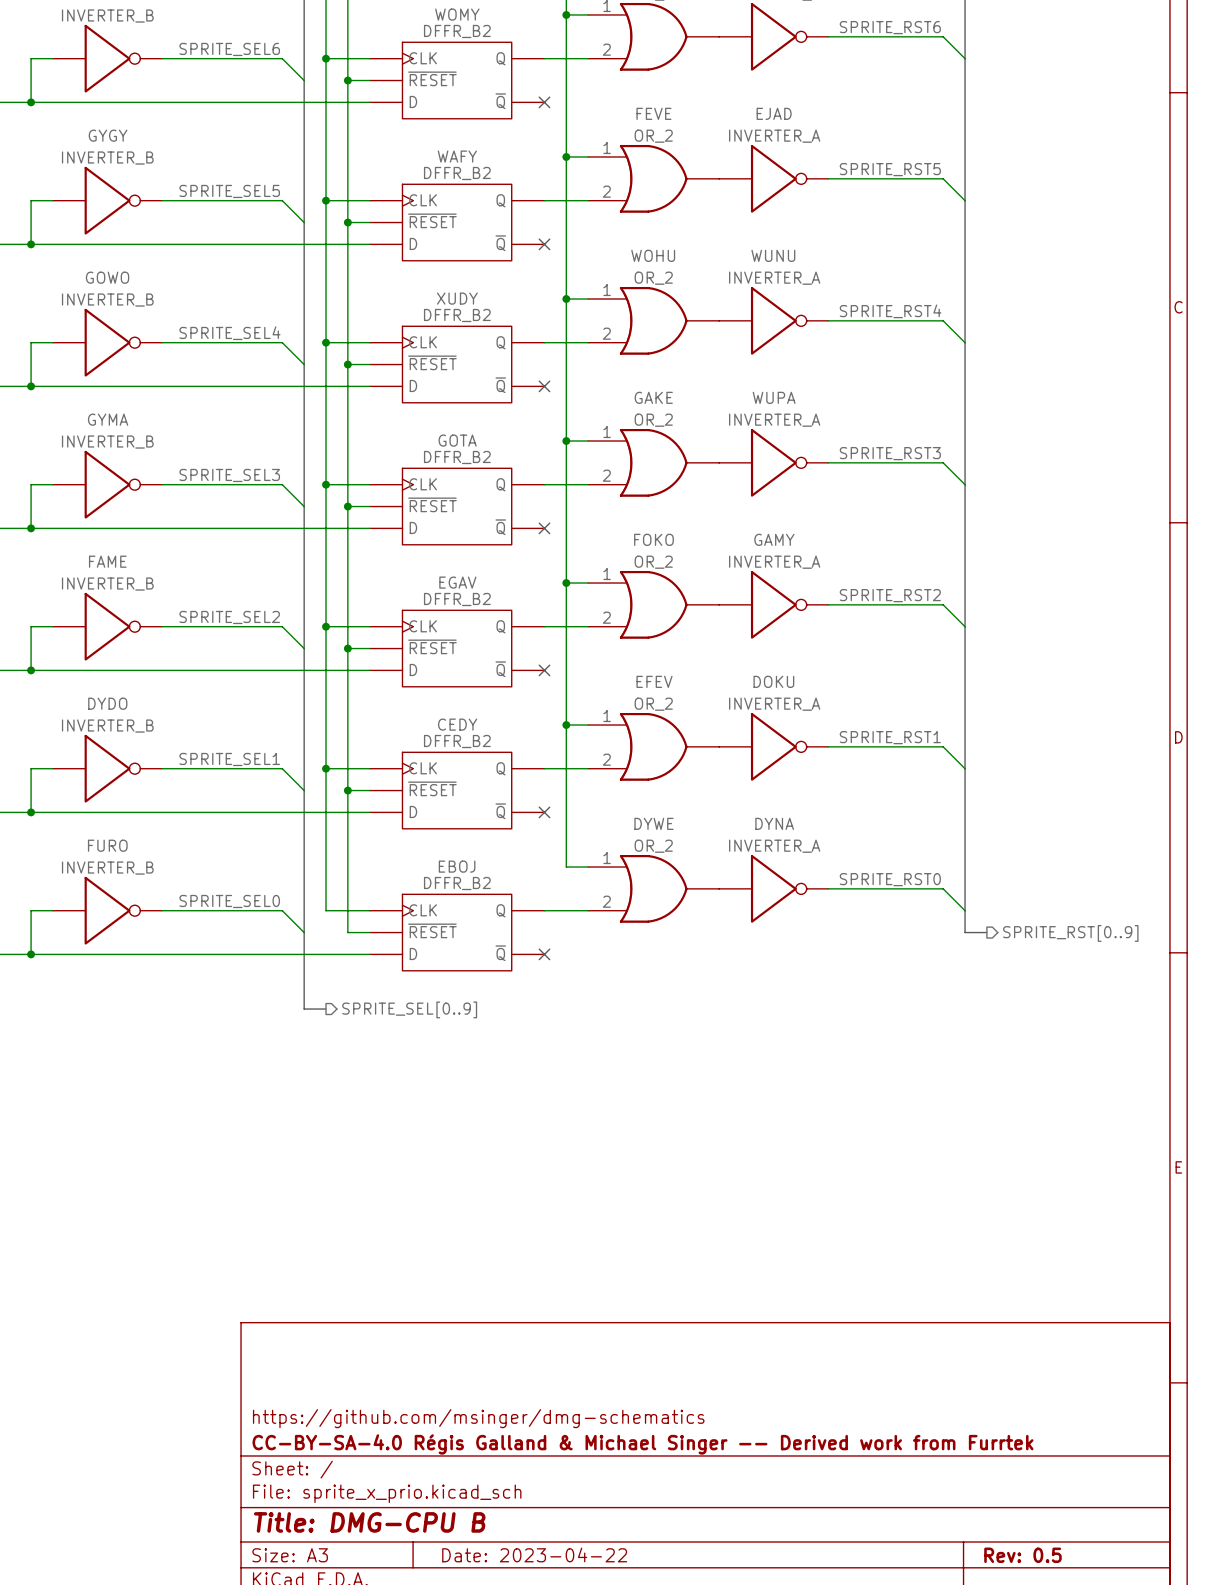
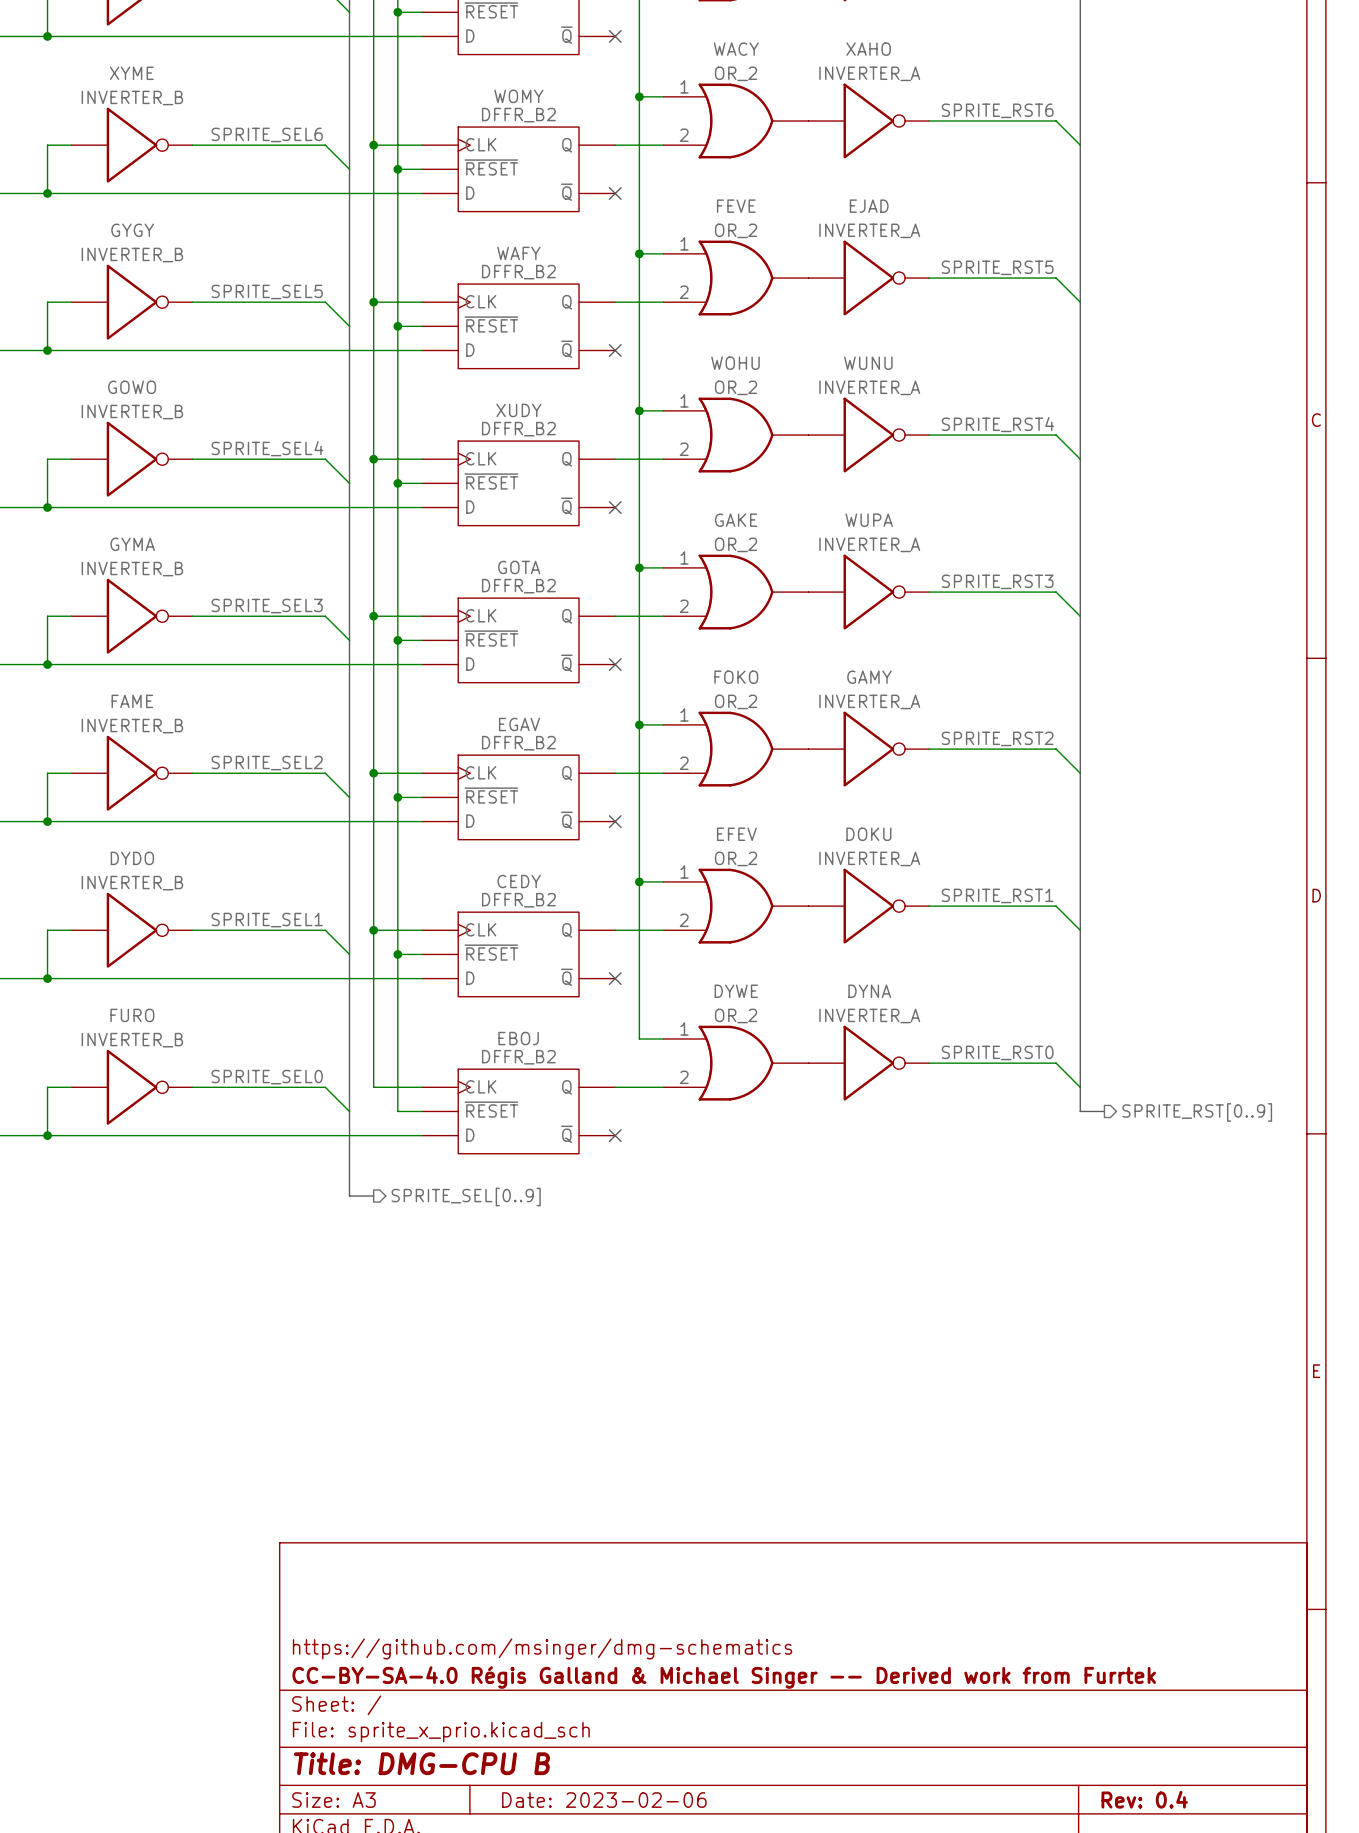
title block: Date: 2023-04-22 (534, 1554) -> Date: 2023-02-06 (604, 1800)
title block: Rev: 0.5 (1022, 1555) -> Rev: 0.4 (1144, 1799)

